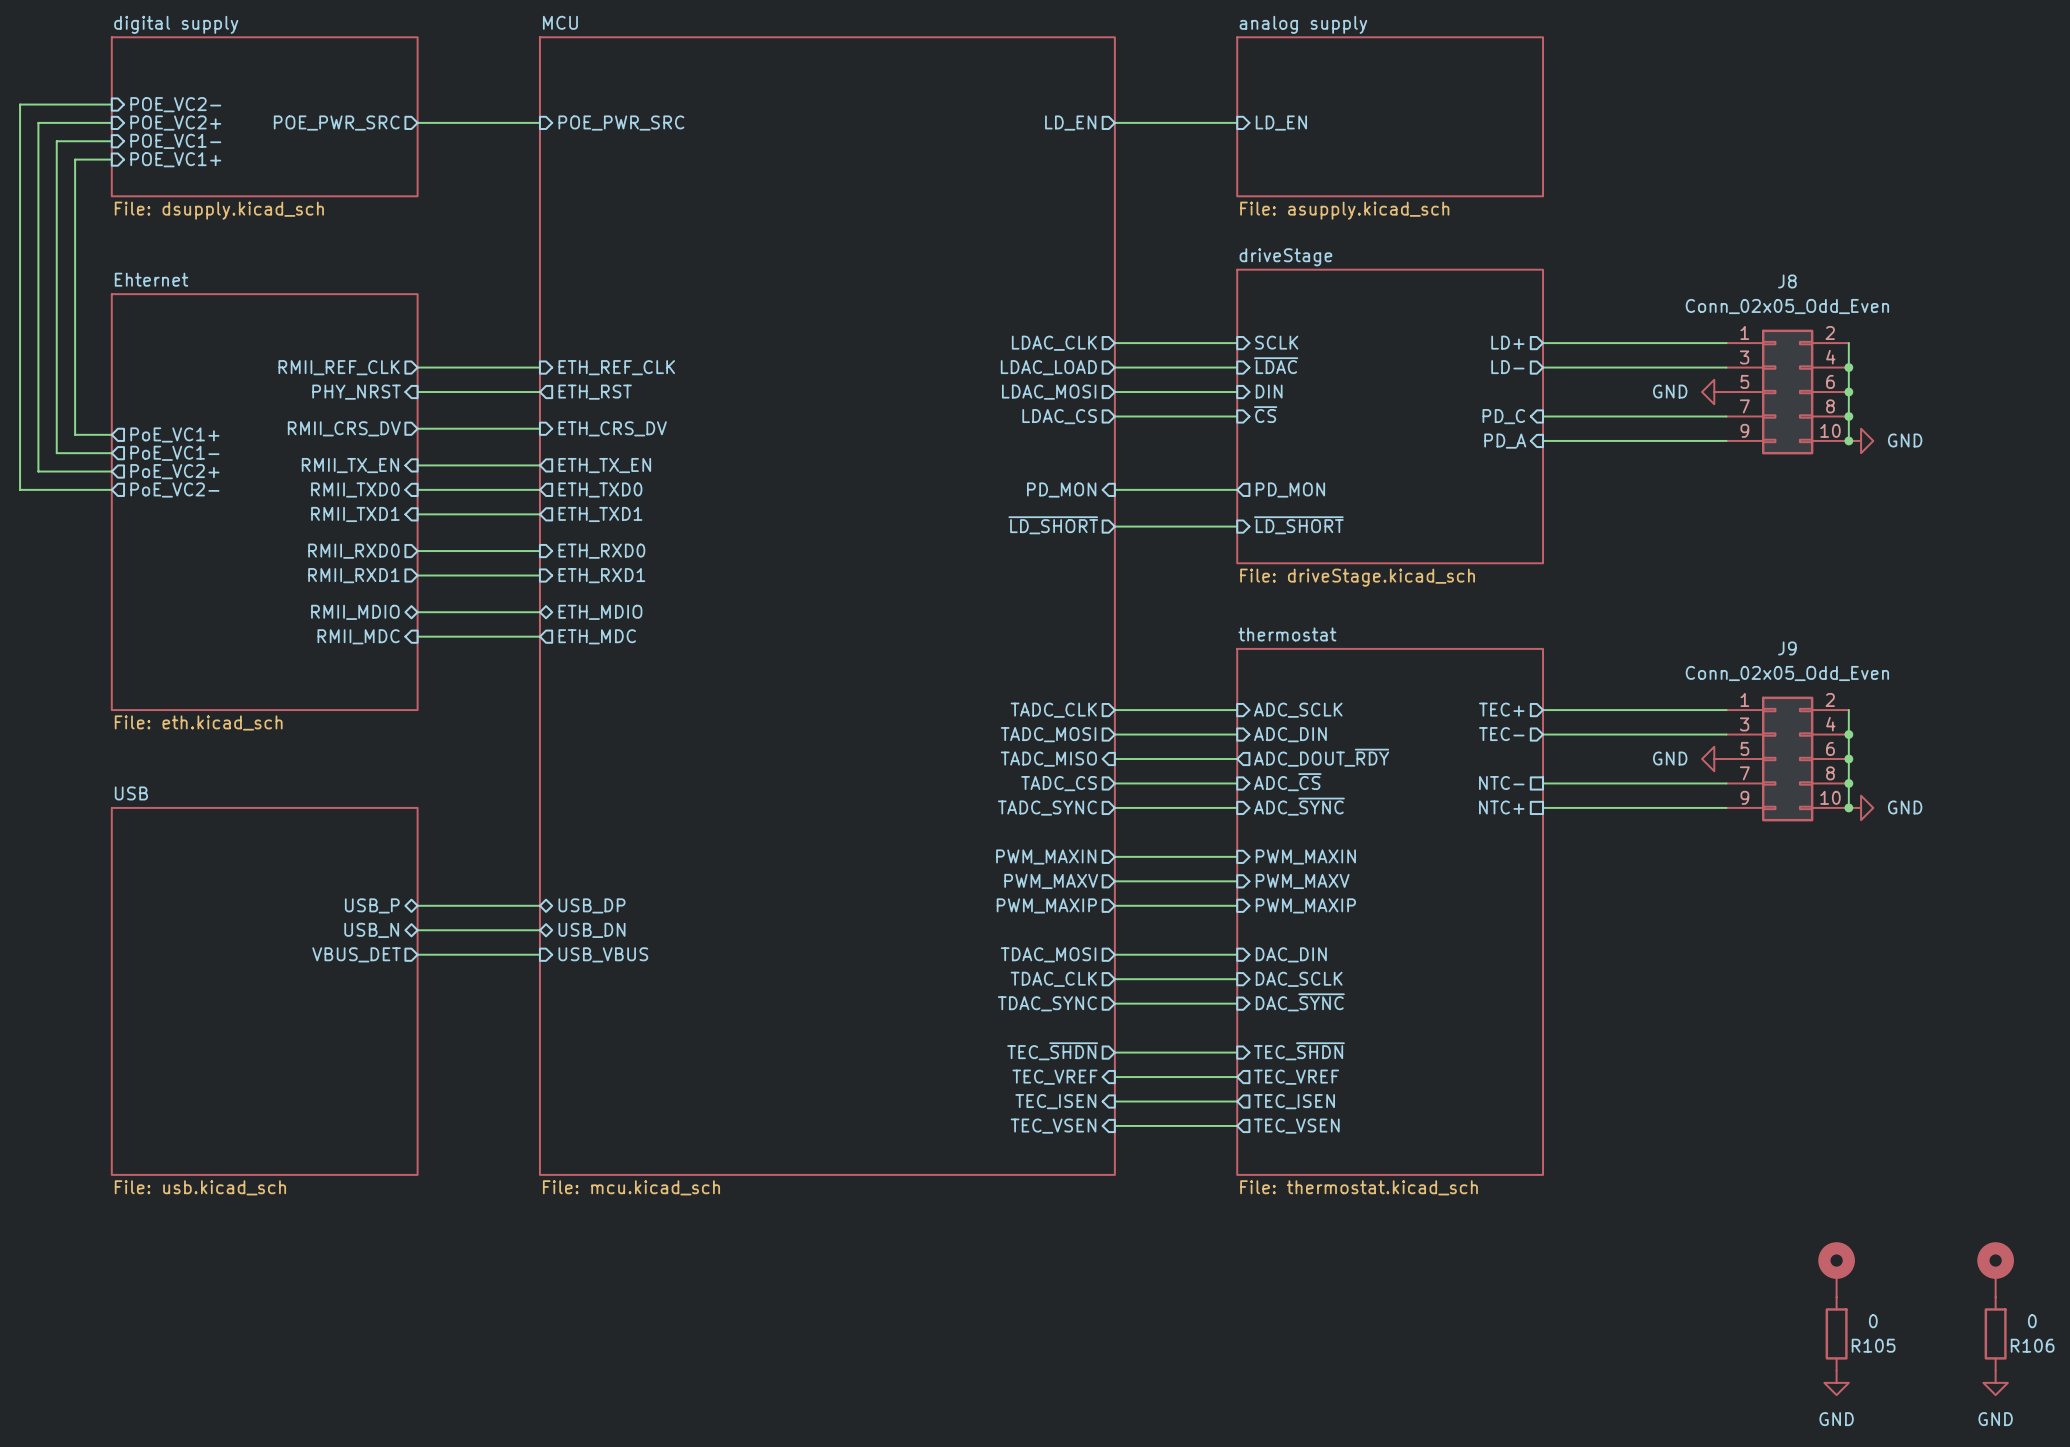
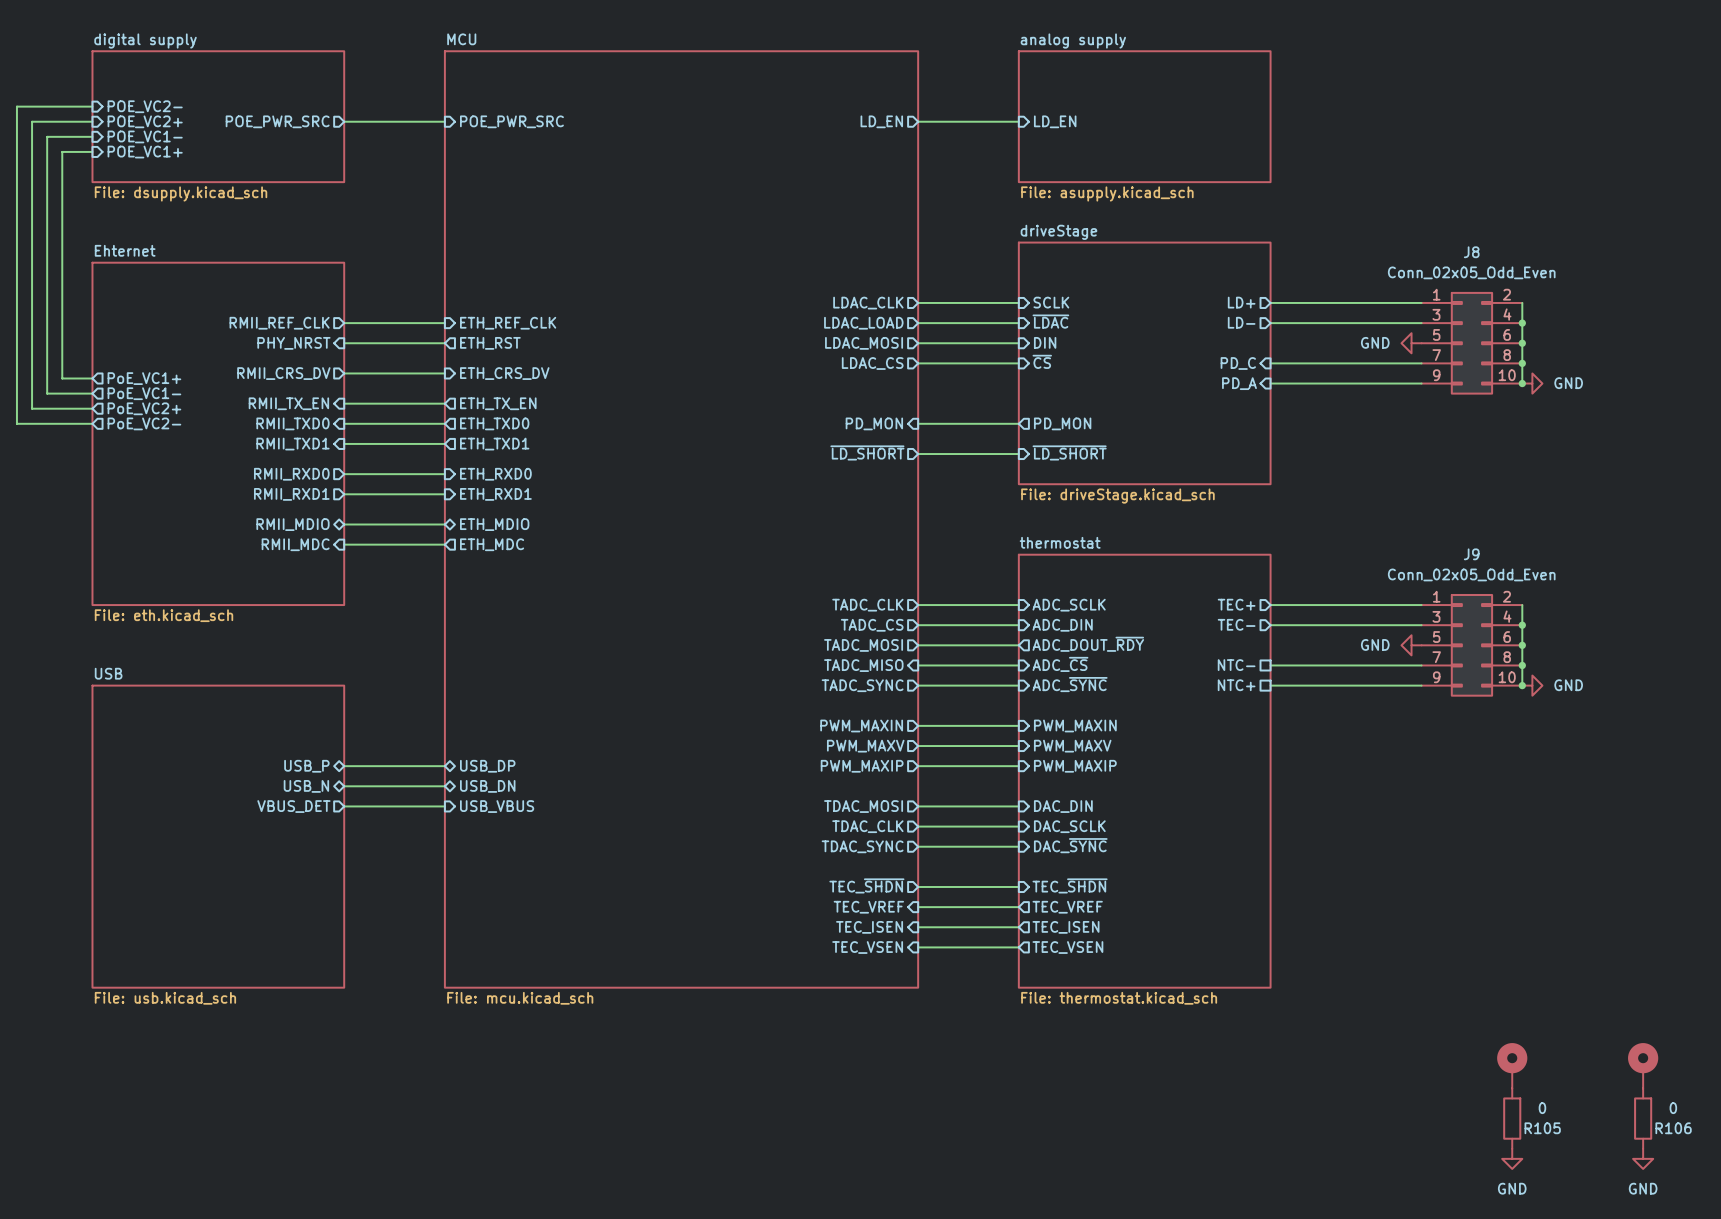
sheet pin: TADC_MOSI (1048, 734) -> TADC_CS (872, 625)
sheet pin shape: input (1048, 759) -> output (863, 645)
sheet pin: TADC_MISO (1048, 759) -> TADC_MOSI (863, 645)
sheet pin shape: output (1059, 783) -> input (863, 665)
sheet pin: TADC_CS (1059, 783) -> TADC_MISO (863, 665)

